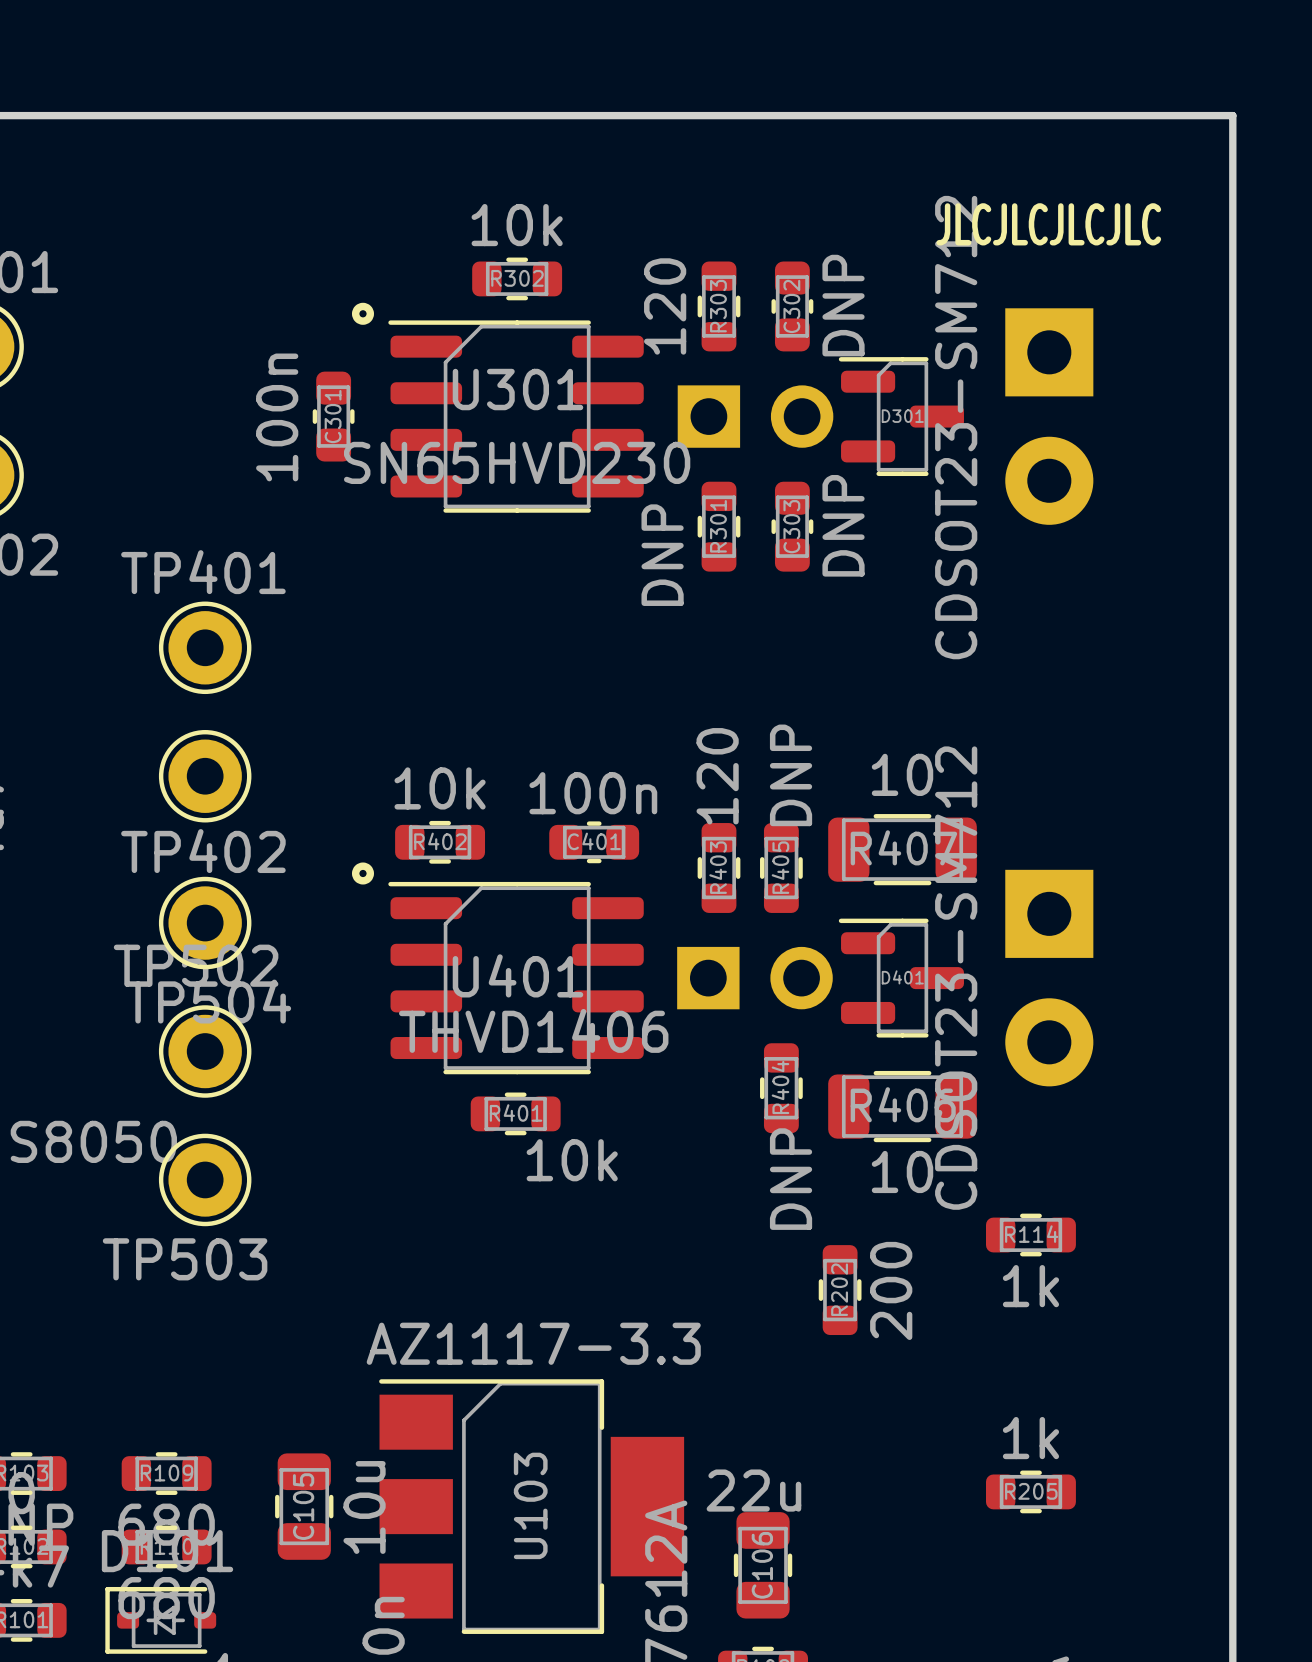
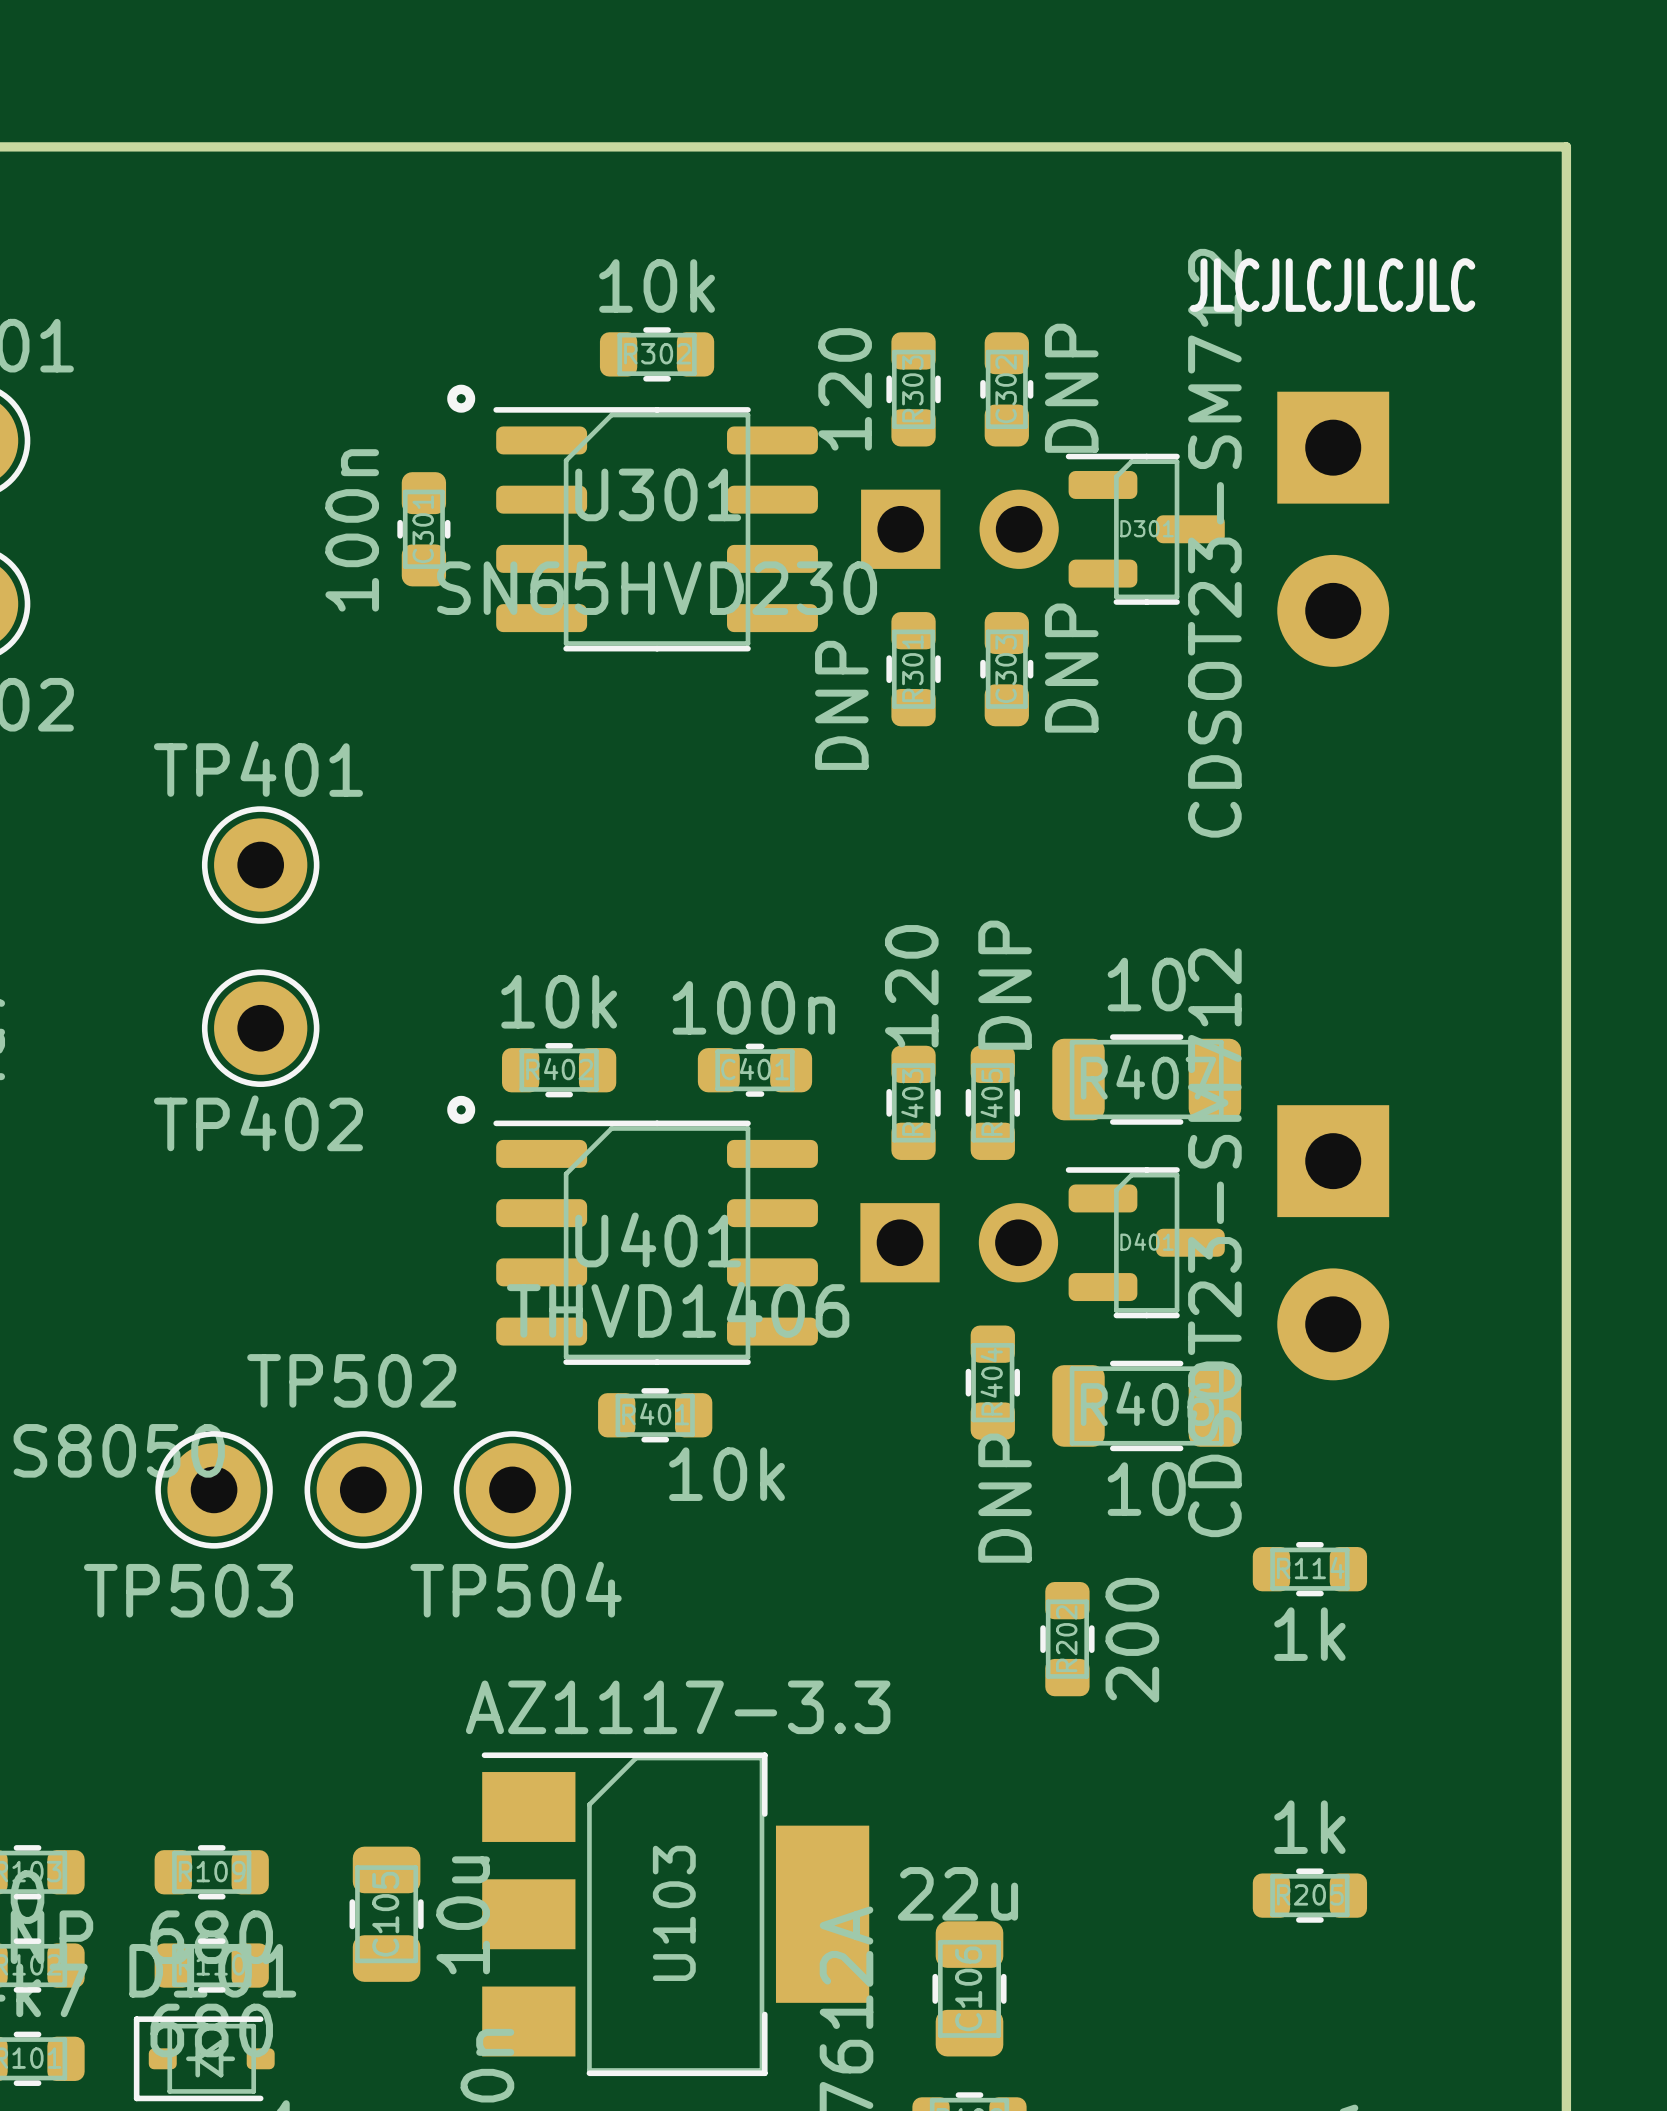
TP401 position: (205, 647) -> (260, 865)
TP402 position: (205, 776) -> (260, 1028)
TP504 position: (205, 923) -> (512, 1489)
TP502 position: (205, 1051) -> (363, 1489)
TP503 position: (205, 1179) -> (214, 1489)

